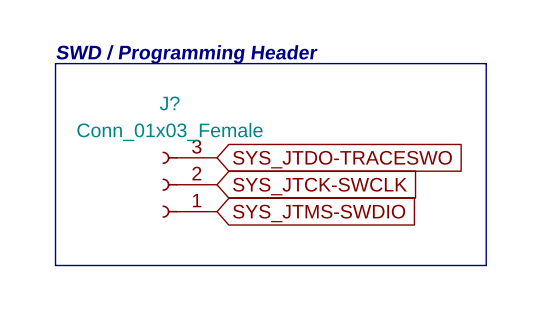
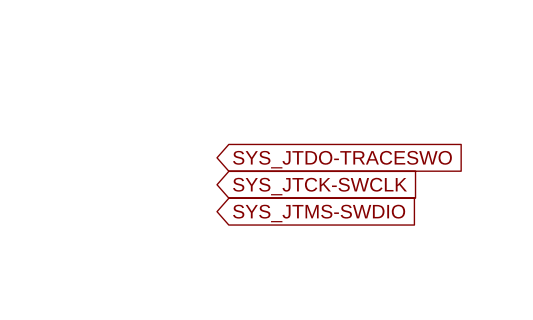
text: SWD / Programming Header (186, 54) -> none
line: (55, 63) (55, 265) (486, 265) (486, 63) (55, 63) -> none
J?: Conn_01x03_Female (189, 184) -> none

